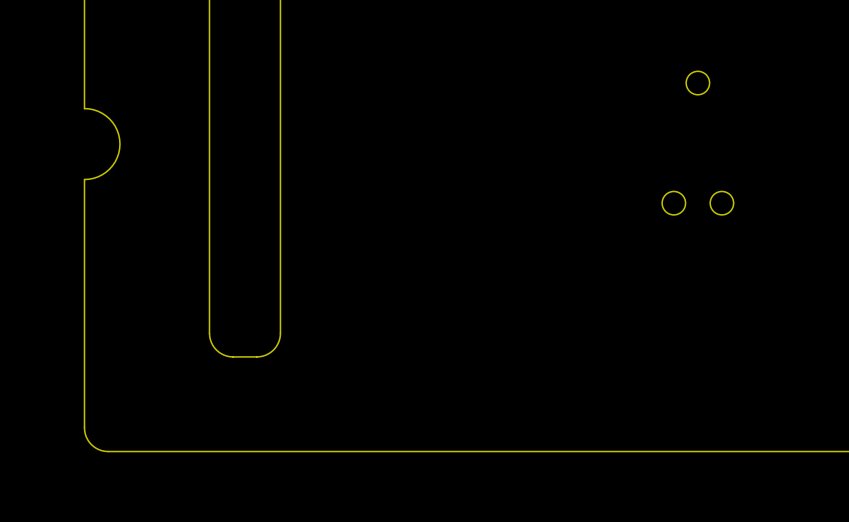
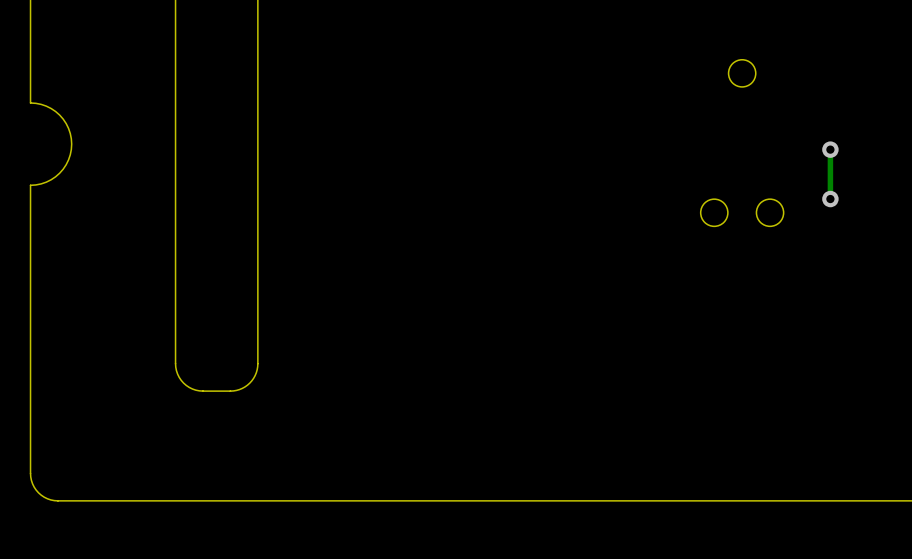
track: none -> (830, 149) (830, 199)
via: none -> (830, 149)
via: none -> (830, 199)

